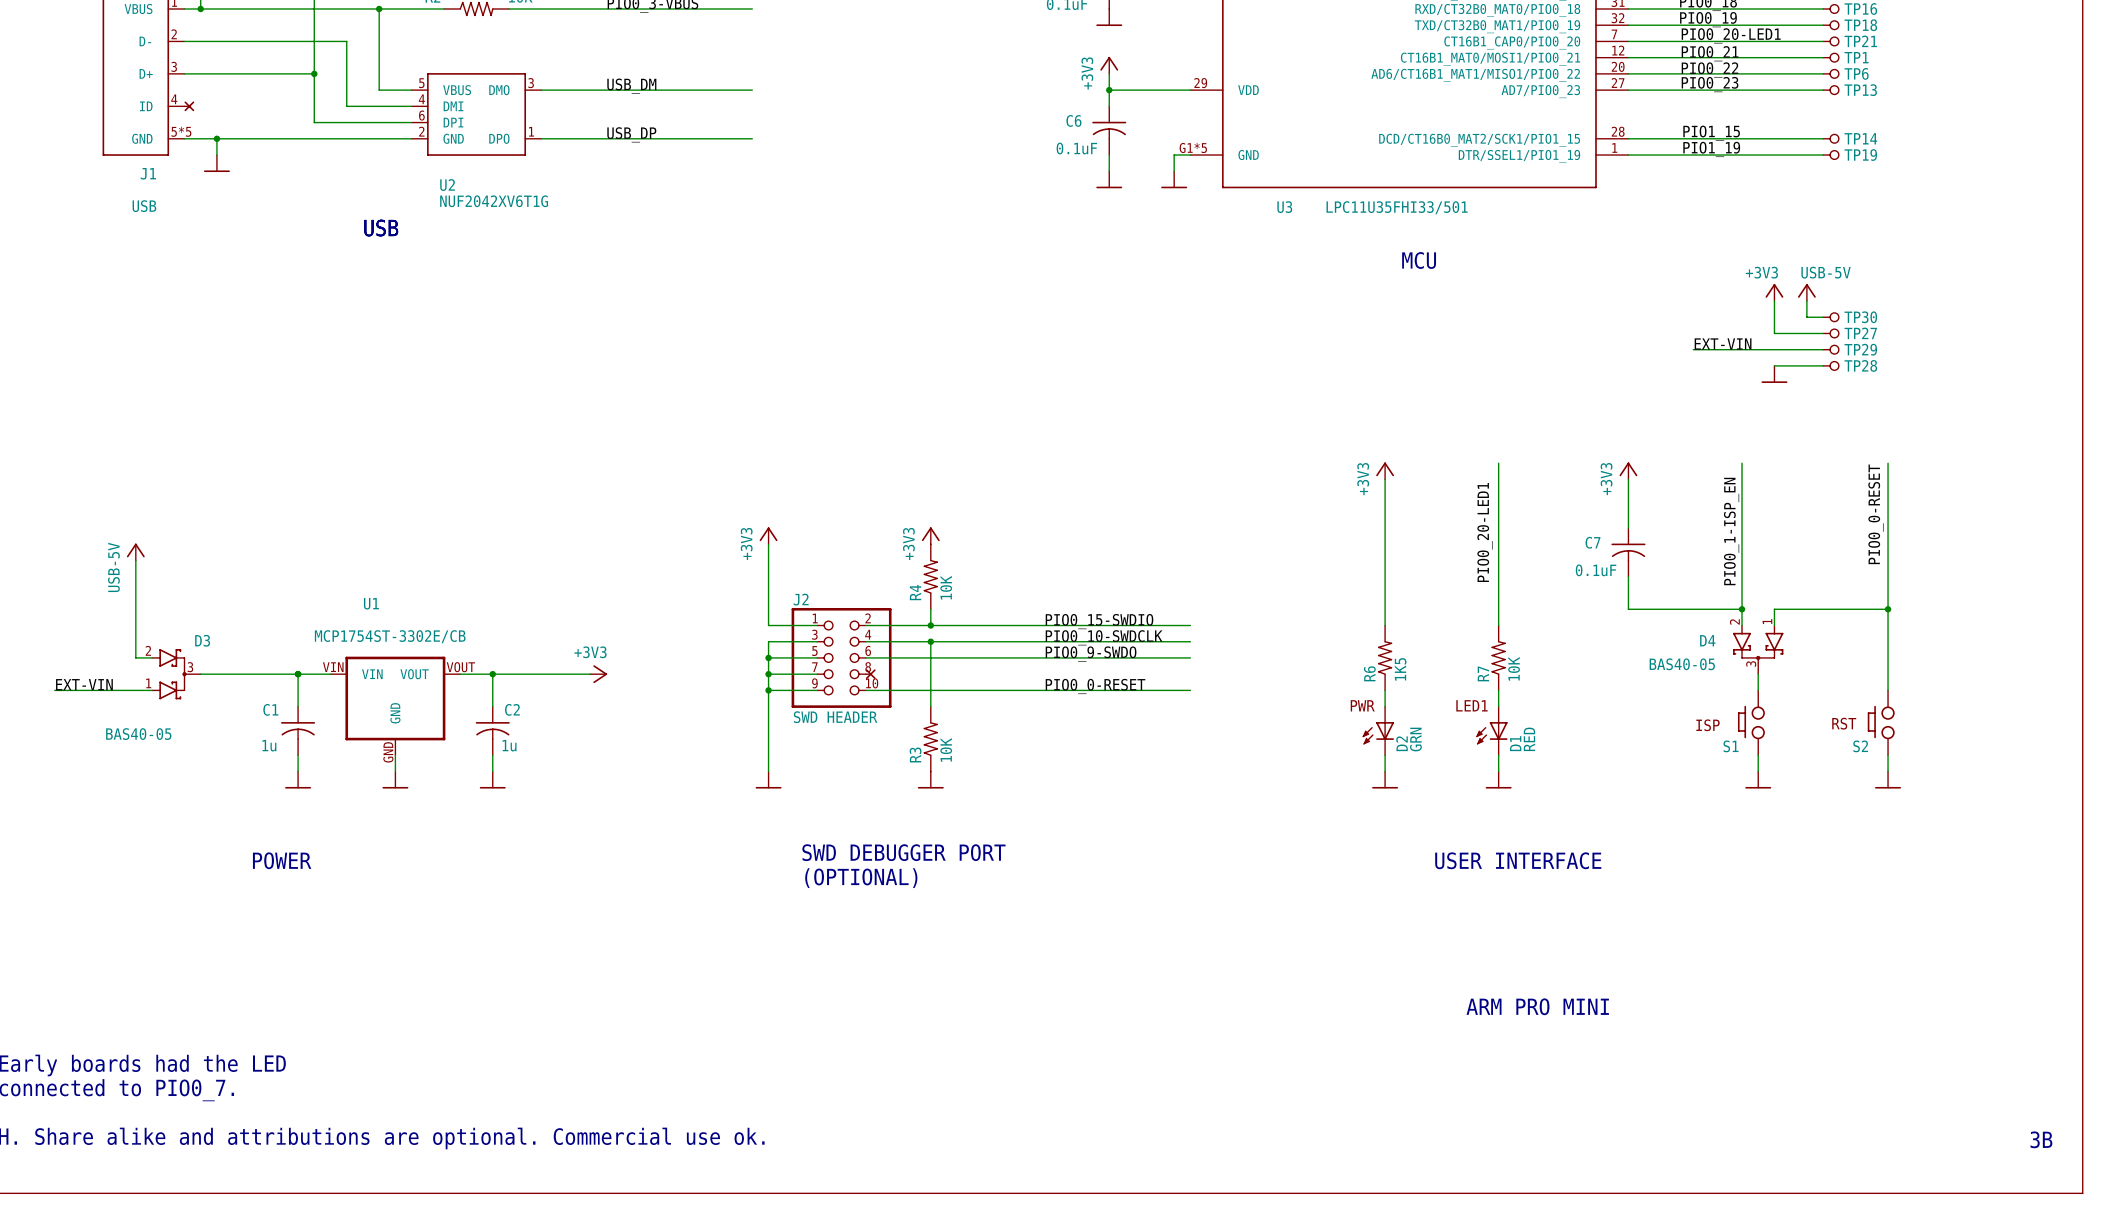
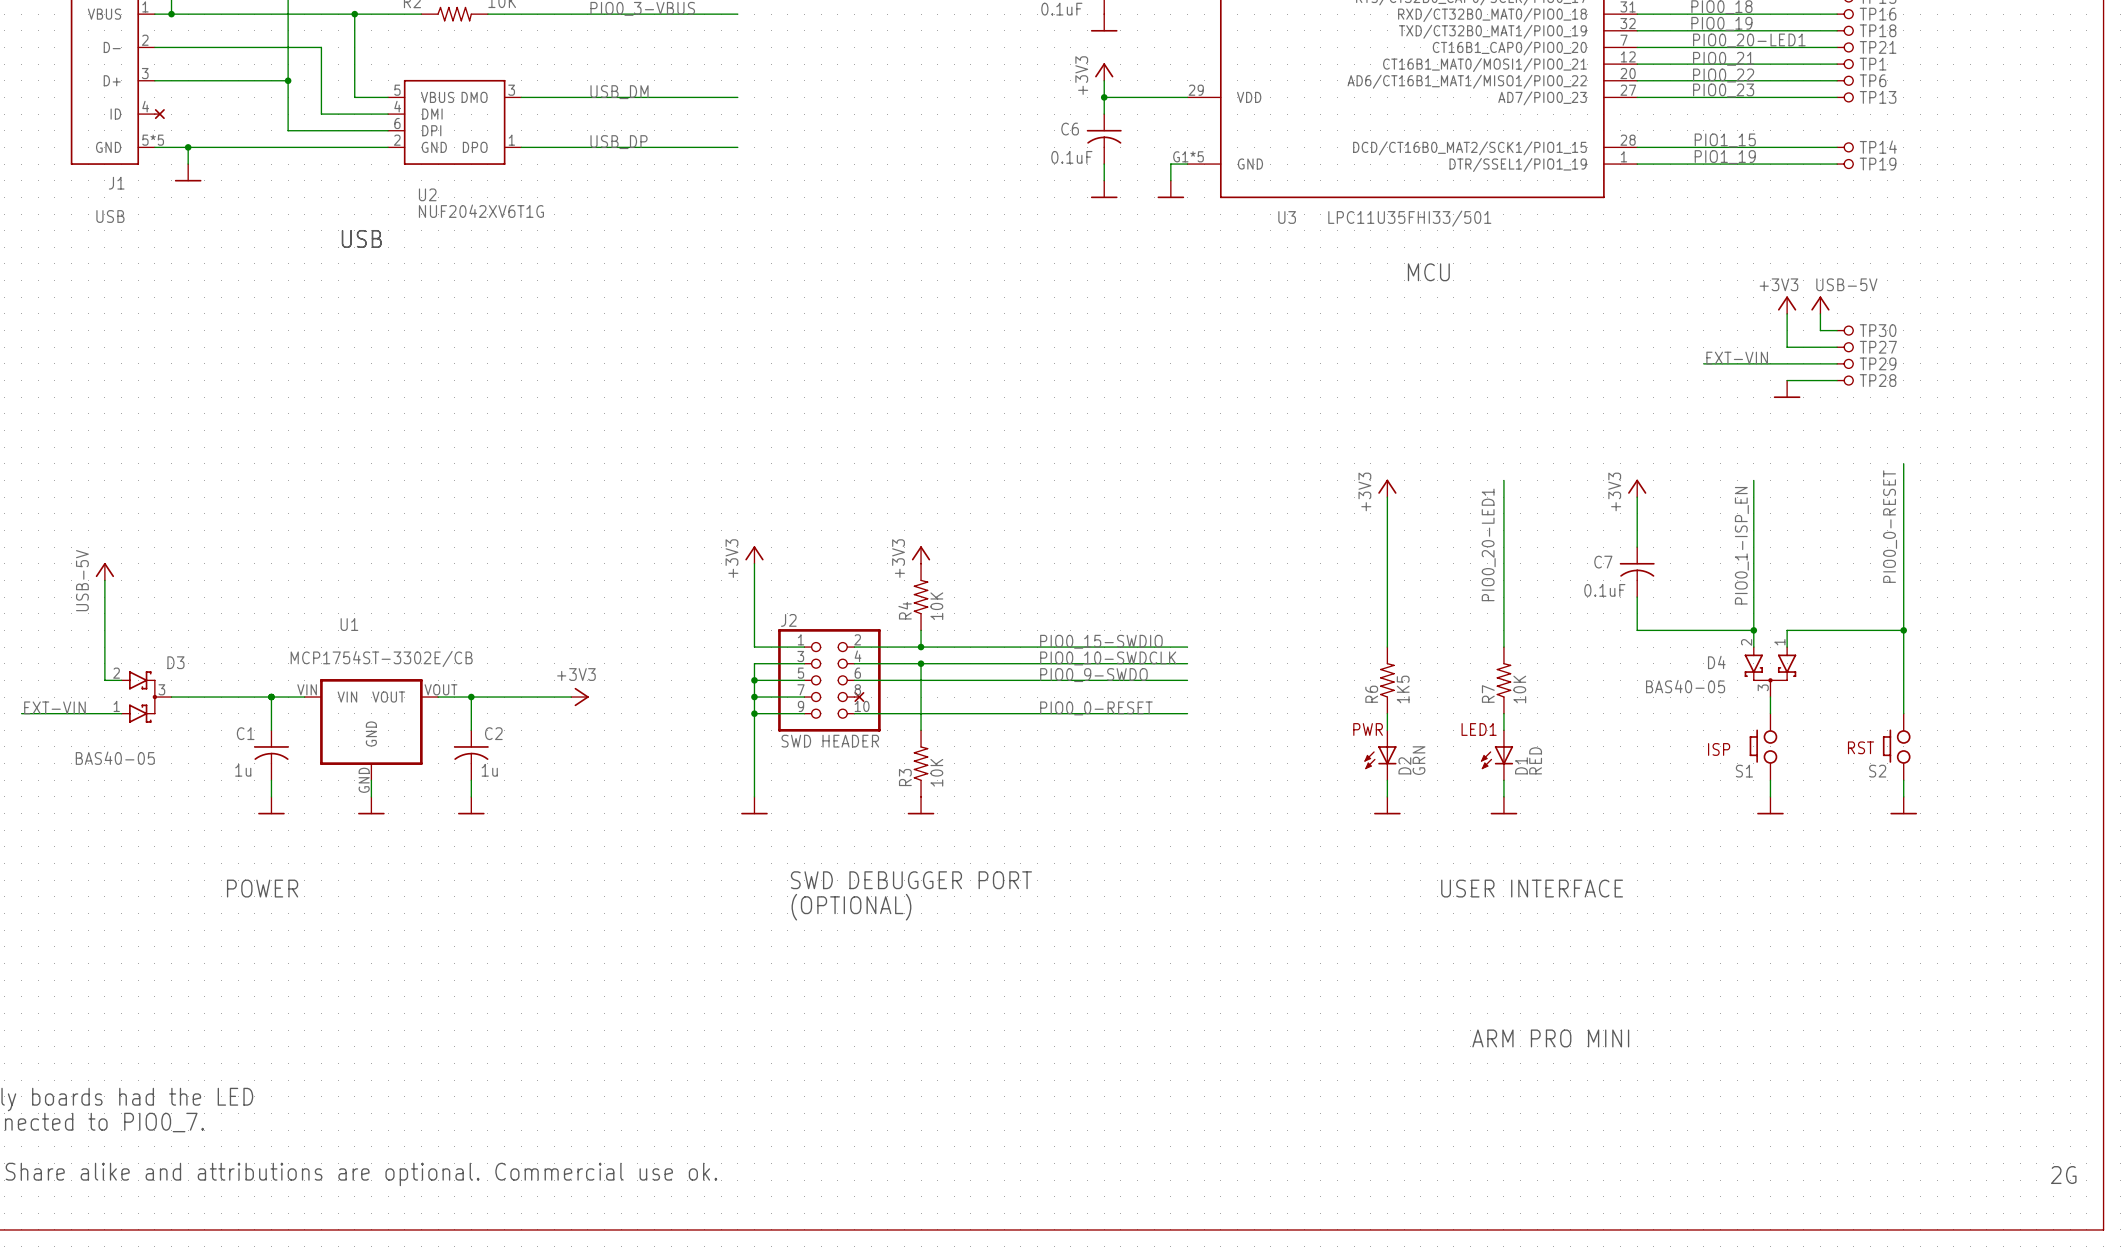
wire: none -> (1903, 463) (1903, 480)
text: 3B (2041, 1139) -> 2G (2063, 1175)

